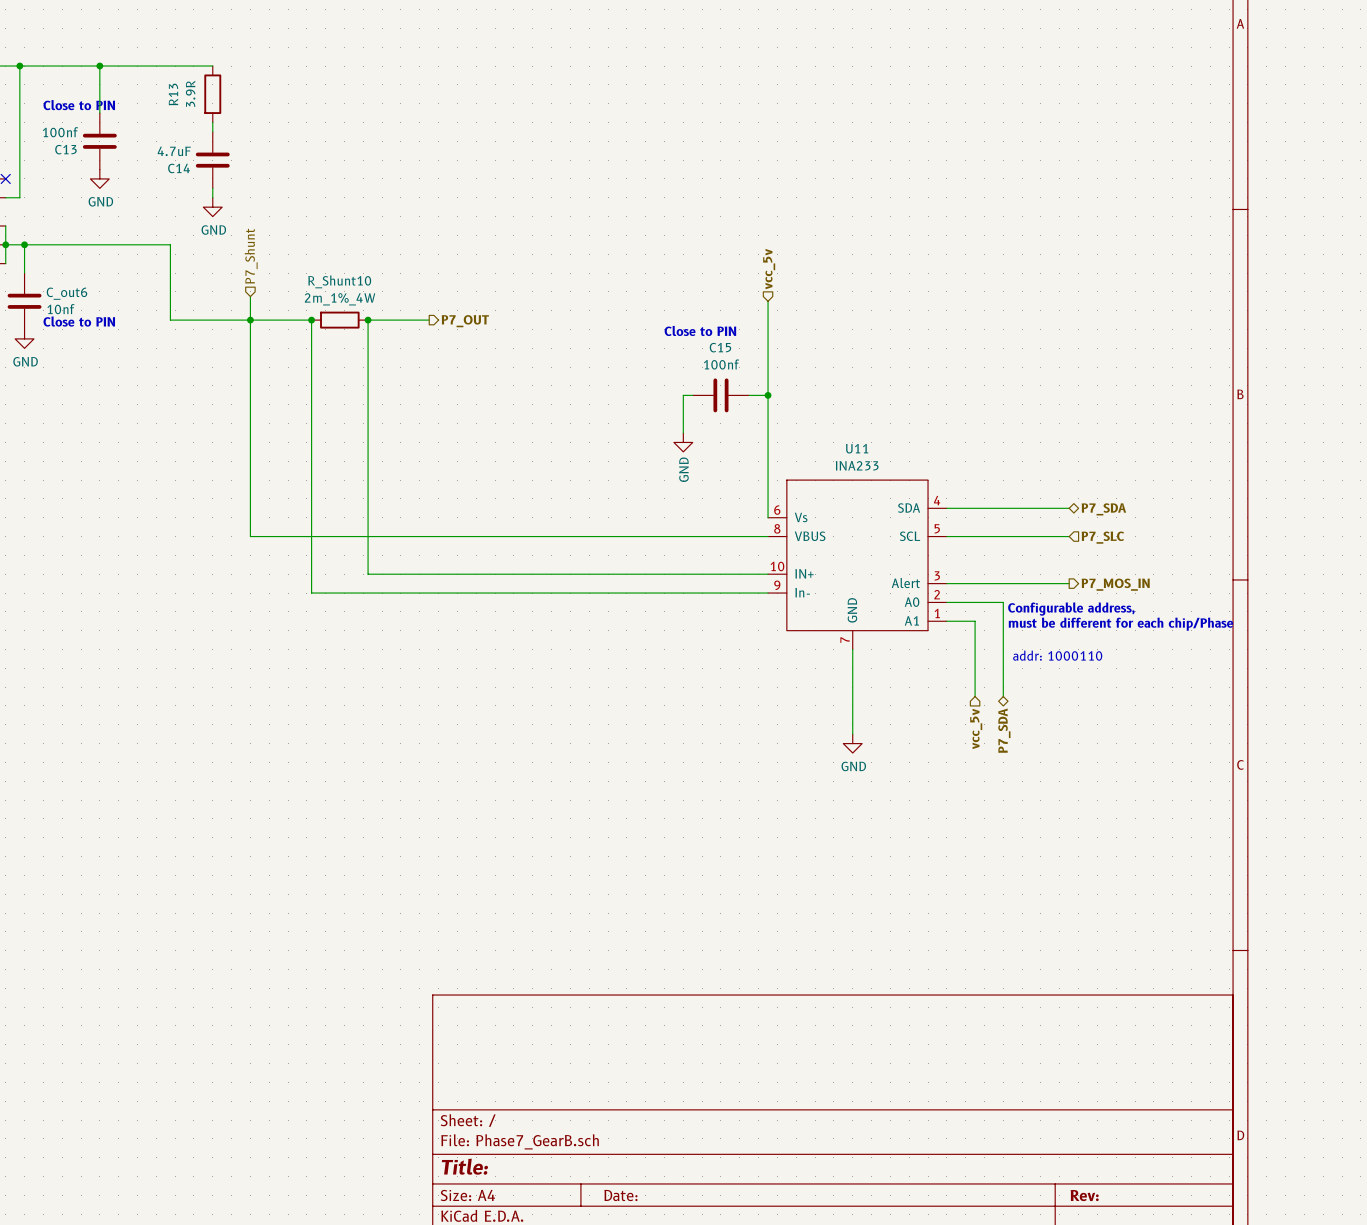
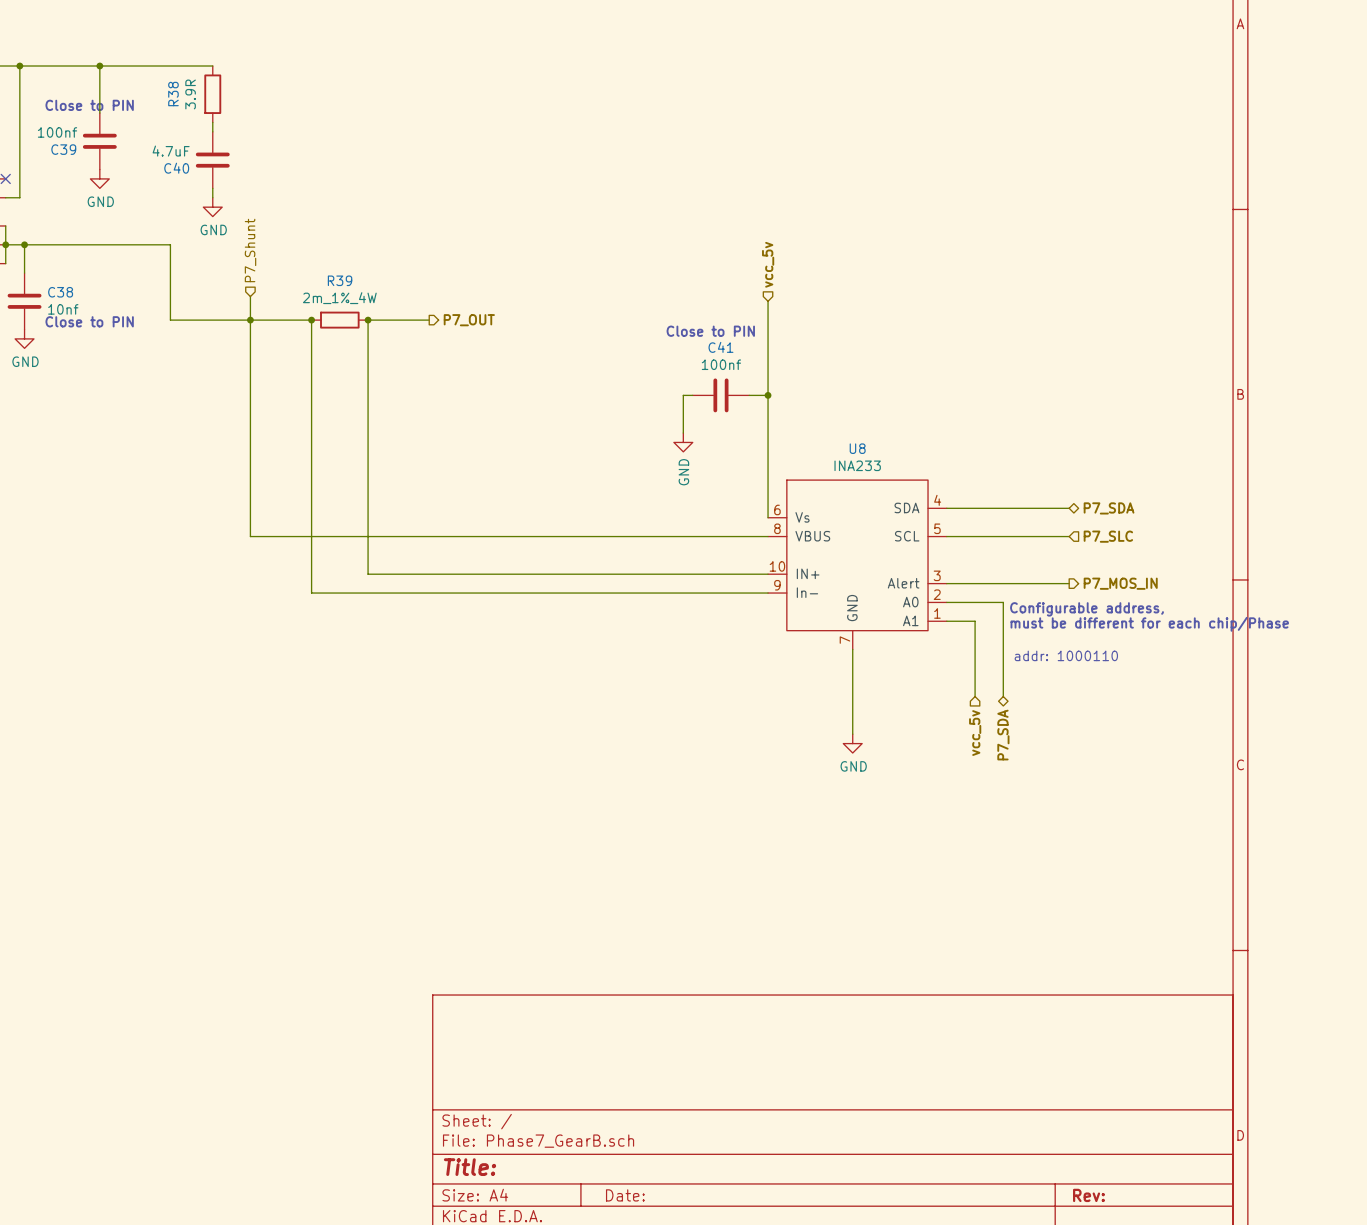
R13 name: R13 (173, 94) -> R38 (173, 94)
C13 name: C13 (65, 149) -> C39 (63, 149)
C14 name: C14 (179, 168) -> C40 (176, 168)
R_Shunt10 name: R_Shunt10 (339, 281) -> R39 (340, 280)
C_out6 name: C_out6 (66, 293) -> C38 (60, 292)
C15 name: C15 (720, 347) -> C41 (720, 347)
U11 name: U11 (857, 448) -> U8 (857, 448)

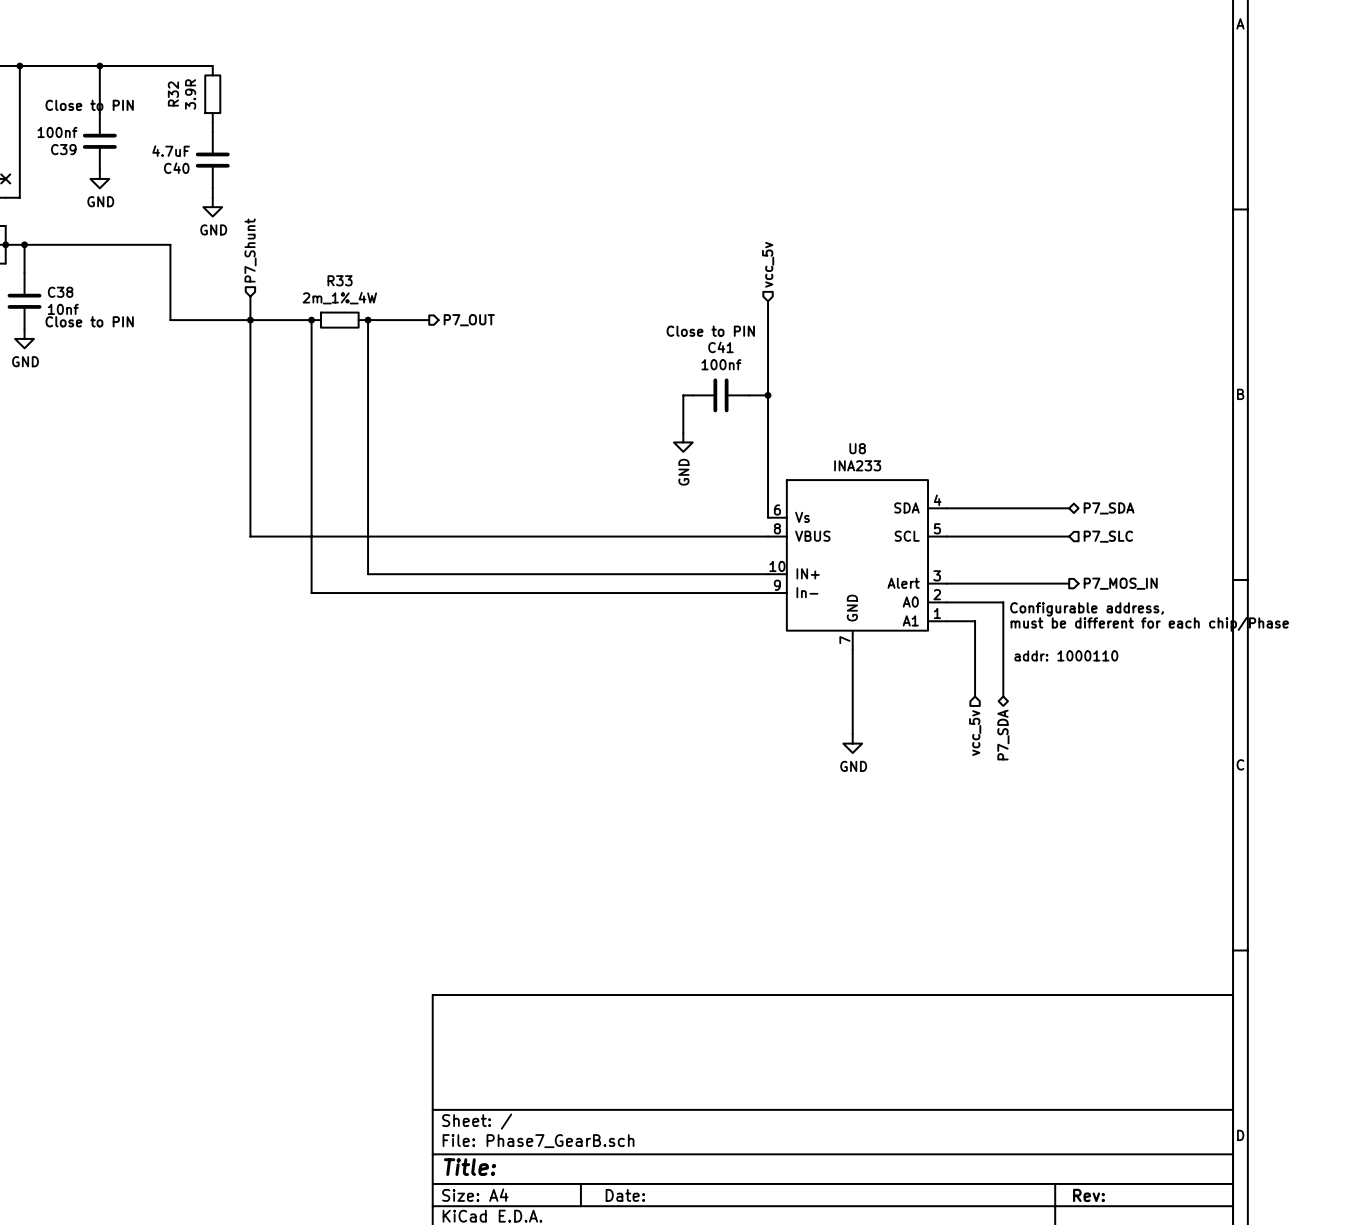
R38 name: R38 (173, 94) -> R32 (173, 94)
R39 name: R39 (340, 280) -> R33 (340, 280)

